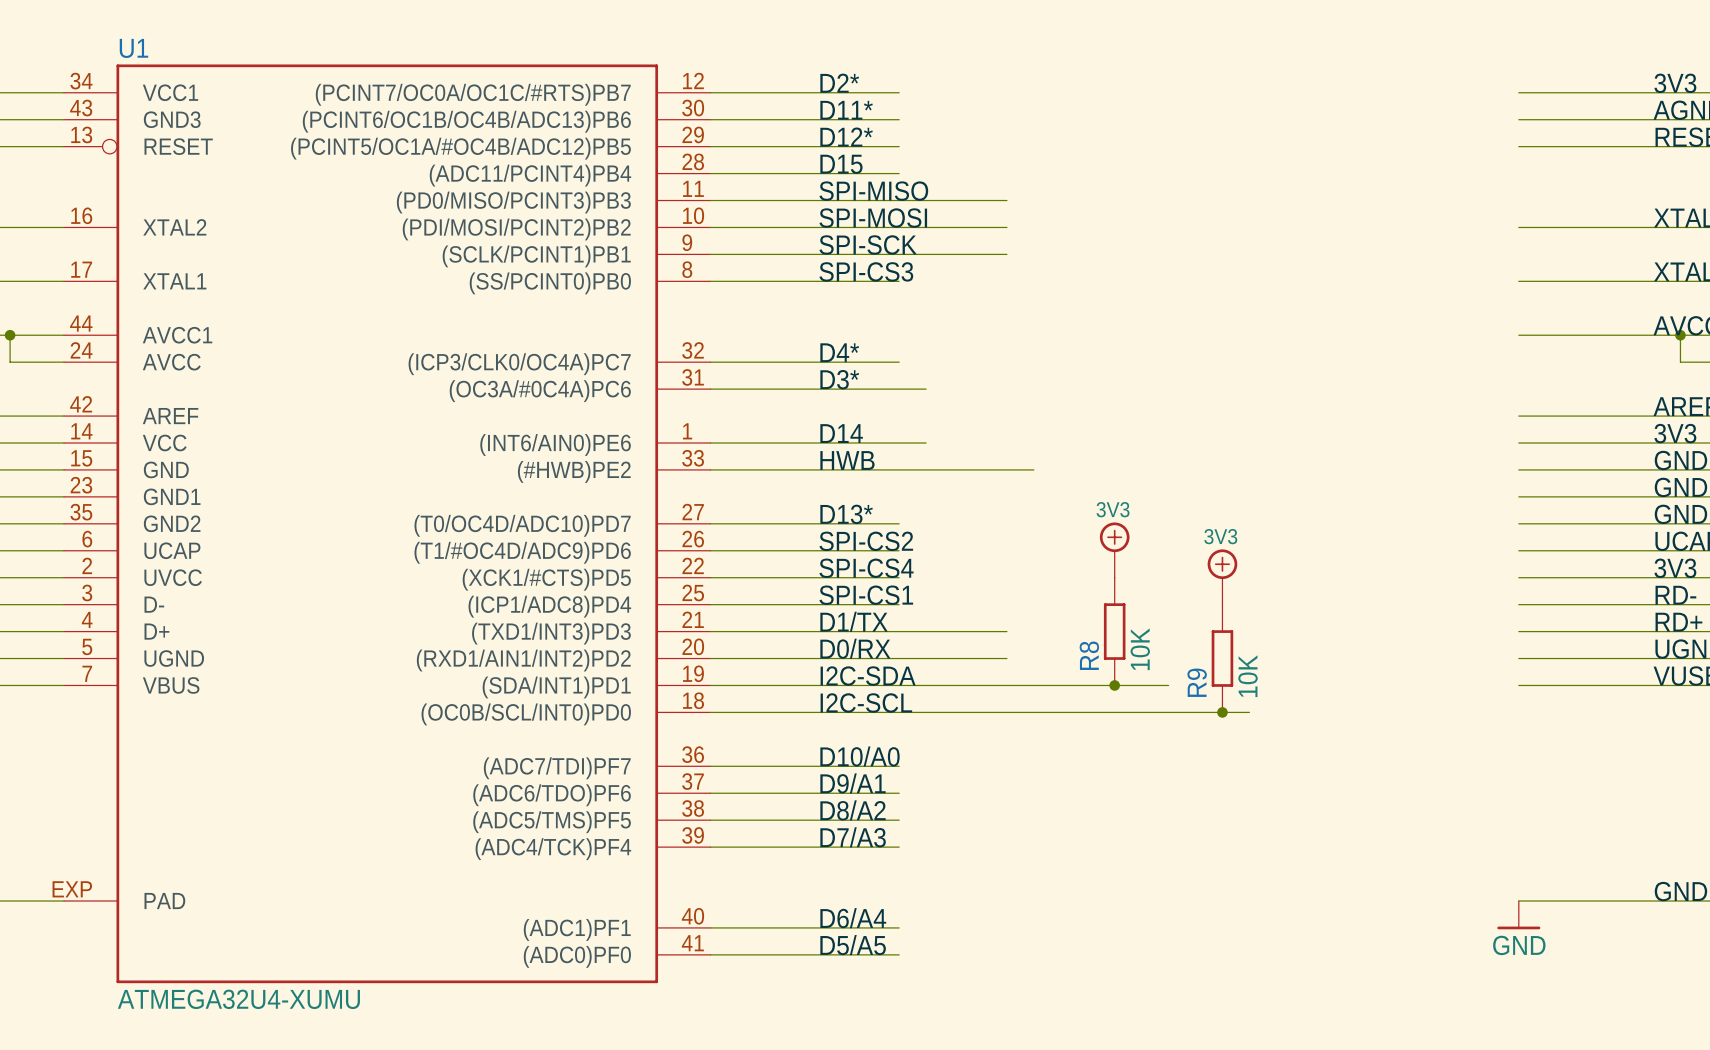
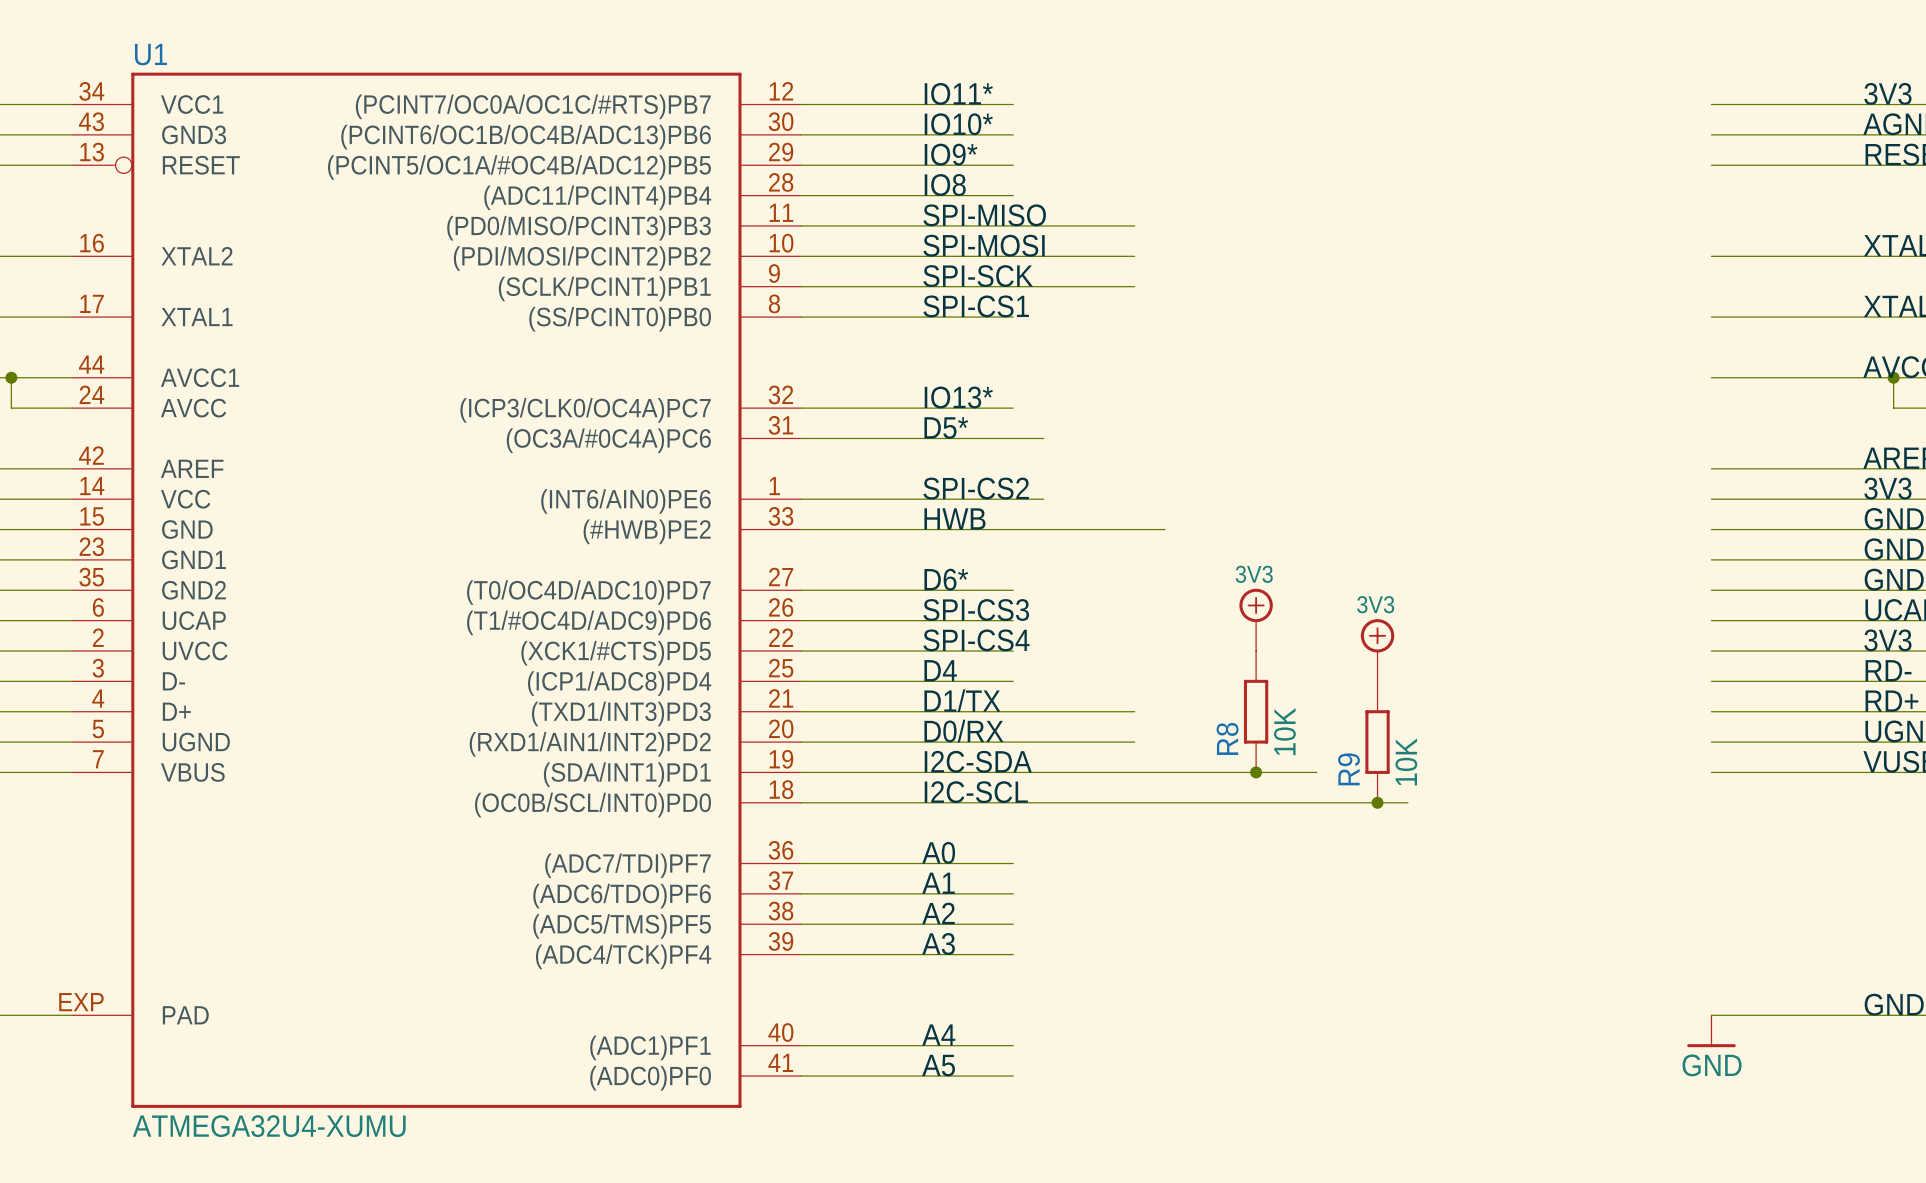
label: D2* (839, 83) -> IO11* (958, 93)
label: D11* (846, 110) -> IO10* (958, 124)
label: D12* (846, 137) -> IO9* (951, 154)
label: D15 (841, 164) -> IO8 (945, 184)
label: SPI-CS3 (866, 271) -> SPI-CS1 (976, 306)
label: D4* (839, 352) -> IO13* (958, 397)
label: D3* (839, 379) -> D5* (946, 428)
label: D14 (841, 433) -> SPI-CS2 (976, 488)
label: D13* (846, 514) -> D6* (946, 579)
label: SPI-CS2 (866, 541) -> SPI-CS3 (976, 610)
label: SPI-CS1 (866, 595) -> D4 (940, 670)
label: D10/A0 (860, 756) -> A0 (938, 852)
label: D9/A1 (853, 783) -> A1 (938, 883)
label: D8/A2 (853, 810) -> A2 (938, 913)
label: D7/A3 (853, 837) -> A3 (938, 943)
label: D6/A4 (853, 918) -> A4 (938, 1035)
label: D5/A5 (853, 945) -> A5 (938, 1065)

